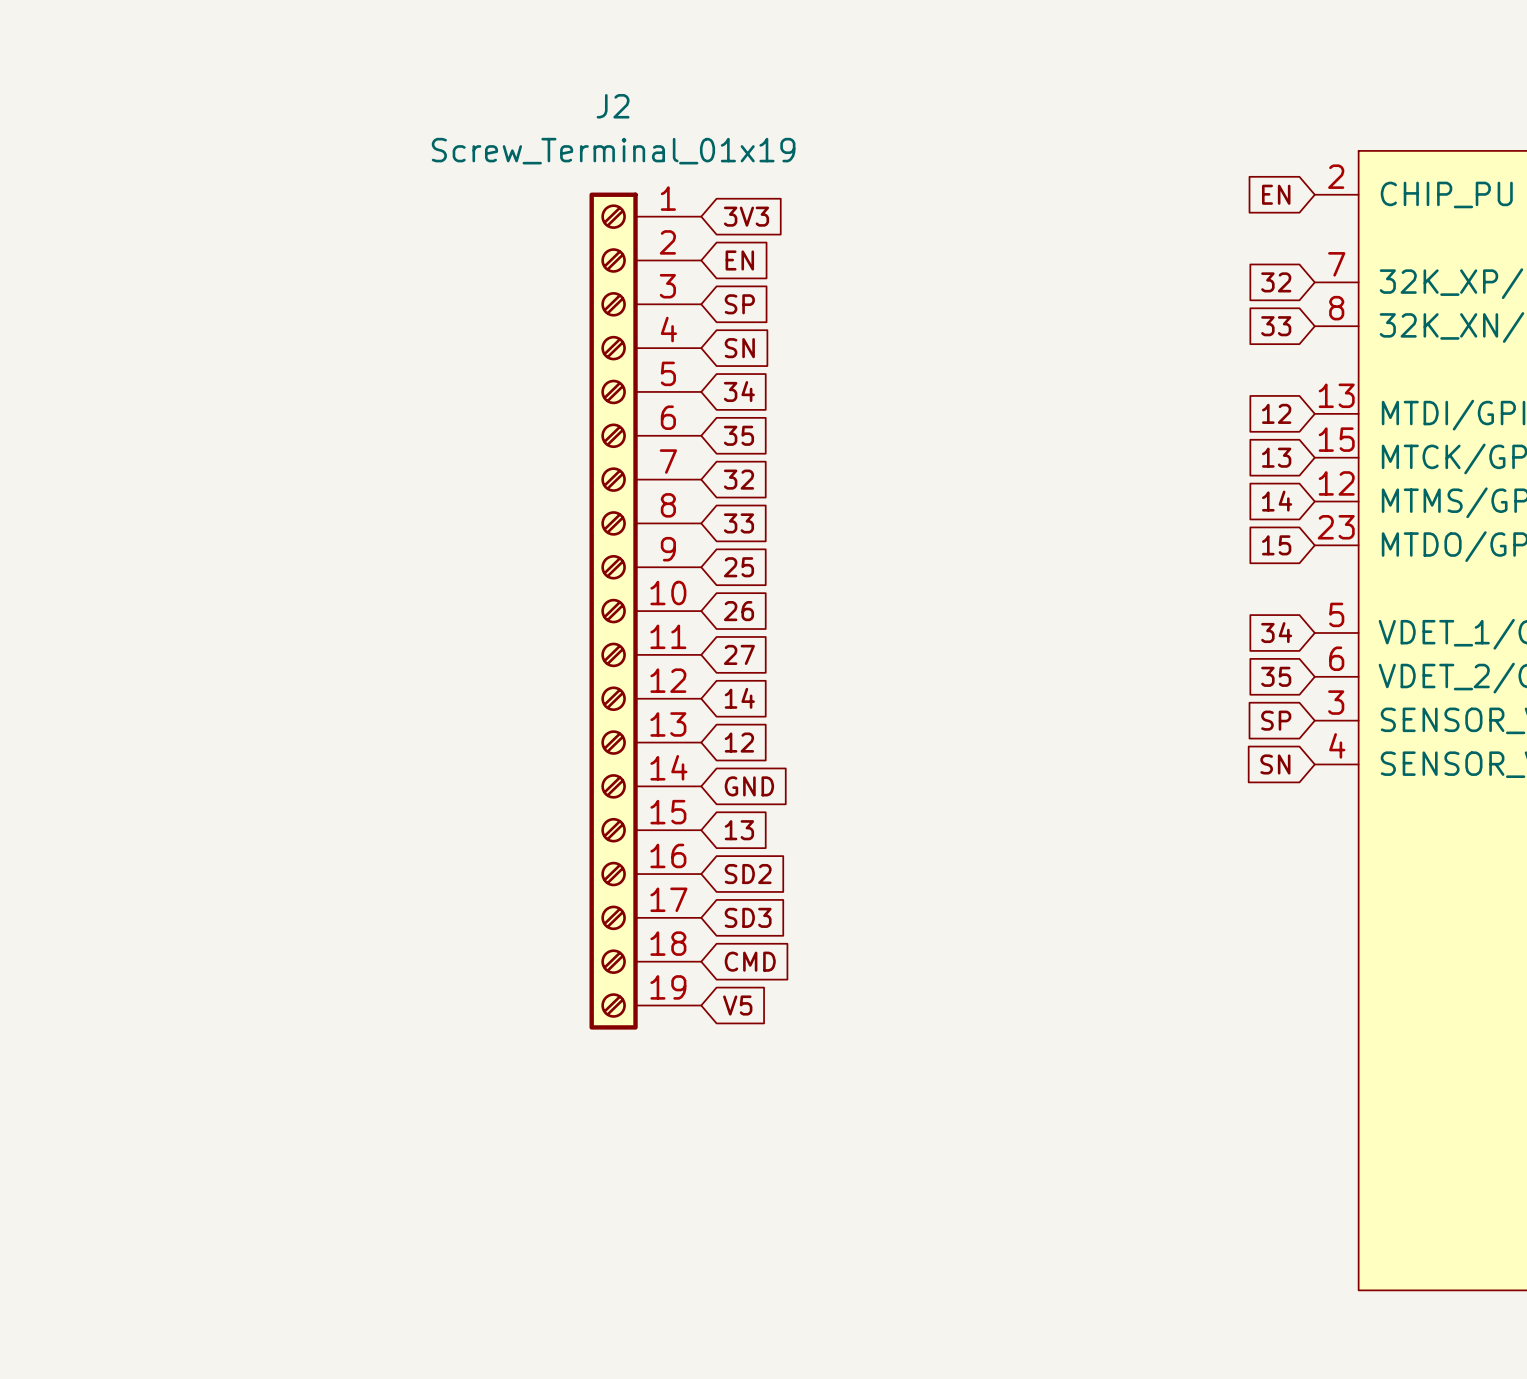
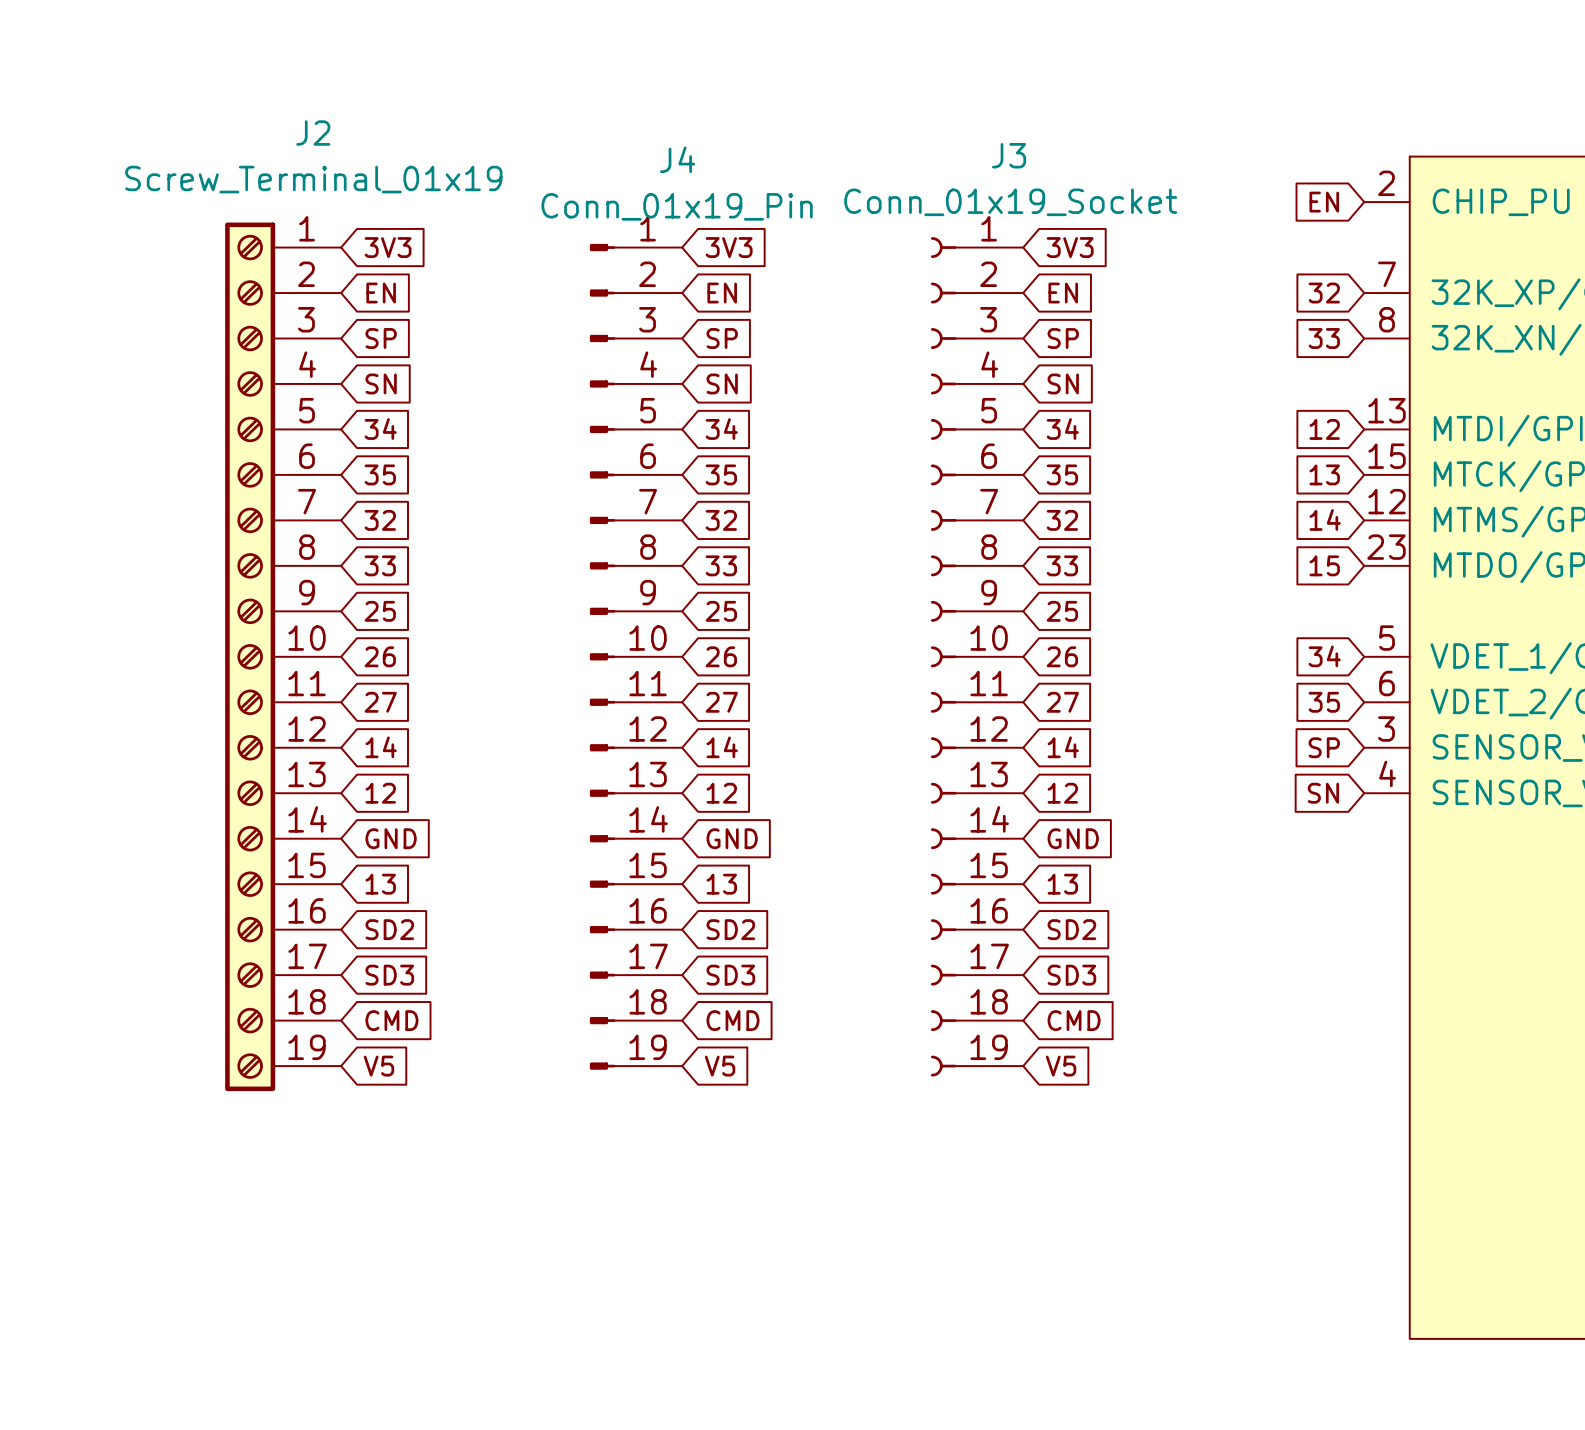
J2 name position: J2 (613, 106) -> J2 (313, 133)
J2 value position: Screw_Terminal_01x19 (613, 151) -> Screw_Terminal_01x19 (313, 179)
global label position: 3V3 (746, 216) -> 3V3 (729, 247)
global label: none -> 3V3 (388, 247)
global label: none -> 3V3 (1070, 247)
global label position: EN (739, 260) -> EN (722, 293)
global label: none -> EN (381, 293)
global label: none -> EN (1063, 293)
global label position: SP (739, 304) -> SP (722, 338)
global label: none -> SP (381, 338)
global label: none -> SP (1063, 338)
global label position: SN (739, 348) -> SN (722, 383)
global label: none -> SN (381, 383)
global label: none -> SN (1063, 383)
global label position: 34 (739, 391) -> 34 (721, 429)
global label: none -> 34 (380, 429)
global label: none -> 34 (1062, 429)
global label position: 35 (738, 435) -> 35 (721, 474)
global label: none -> 35 (380, 474)
global label: none -> 35 (1062, 474)
global label position: 32 (738, 479) -> 32 (721, 520)
global label: none -> 32 (380, 520)
global label: none -> 32 (1062, 520)
global label position: 33 (738, 523) -> 33 (721, 565)
global label: none -> 33 (380, 565)
global label: none -> 33 (1062, 565)
global label position: 25 (738, 567) -> 25 (721, 611)
global label: none -> 25 (380, 611)
global label: none -> 25 (1062, 611)
J2 position: (645, 611) -> (283, 656)
global label position: 26 (738, 611) -> 26 (721, 656)
global label: none -> 26 (380, 656)
J4: none -> Conn_01x19_Pin (636, 656)
J3: none -> Conn_01x19_Socket (977, 656)
global label: none -> 26 (1062, 656)
global label position: 27 (739, 654) -> 27 (721, 702)
global label: none -> 27 (380, 702)
global label: none -> 27 (1062, 702)
global label position: 14 (739, 698) -> 14 (722, 747)
global label: none -> 14 (381, 747)
global label: none -> 14 (1063, 747)
global label position: 12 (739, 742) -> 12 (721, 793)
global label: none -> 12 (380, 793)
global label: none -> 12 (1062, 793)
global label position: GND (749, 786) -> GND (732, 838)
global label: none -> GND (391, 838)
global label: none -> GND (1073, 838)
global label position: 13 (739, 830) -> 13 (721, 884)
global label: none -> 13 (380, 884)
global label: none -> 13 (1062, 884)
global label position: SD2 (748, 874) -> SD2 (730, 929)
global label: none -> SD2 (389, 929)
global label: none -> SD2 (1071, 929)
global label position: SD3 (748, 917) -> SD3 (730, 975)
global label: none -> SD3 (389, 975)
global label: none -> SD3 (1071, 975)
global label position: CMD (750, 961) -> CMD (733, 1020)
global label: none -> CMD (391, 1020)
global label: none -> CMD (1074, 1020)
global label position: V5 (737, 1005) -> V5 (720, 1066)
global label: none -> V5 (378, 1066)
global label: none -> V5 (1061, 1066)

